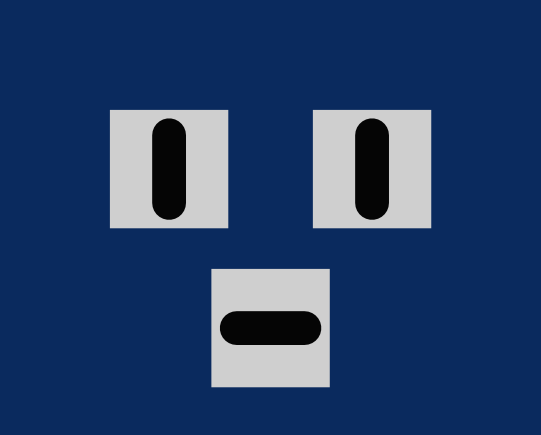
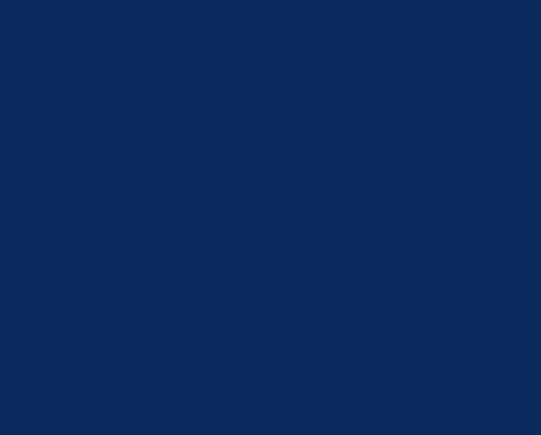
part: (270, 248) -> none

